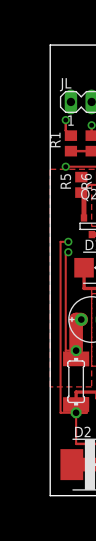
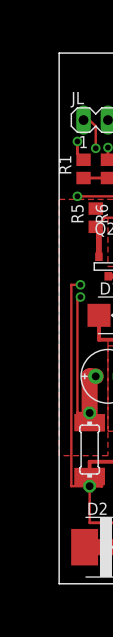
track: none -> (83, 114) (95, 126) (95, 148)
via: none -> (95, 148)

